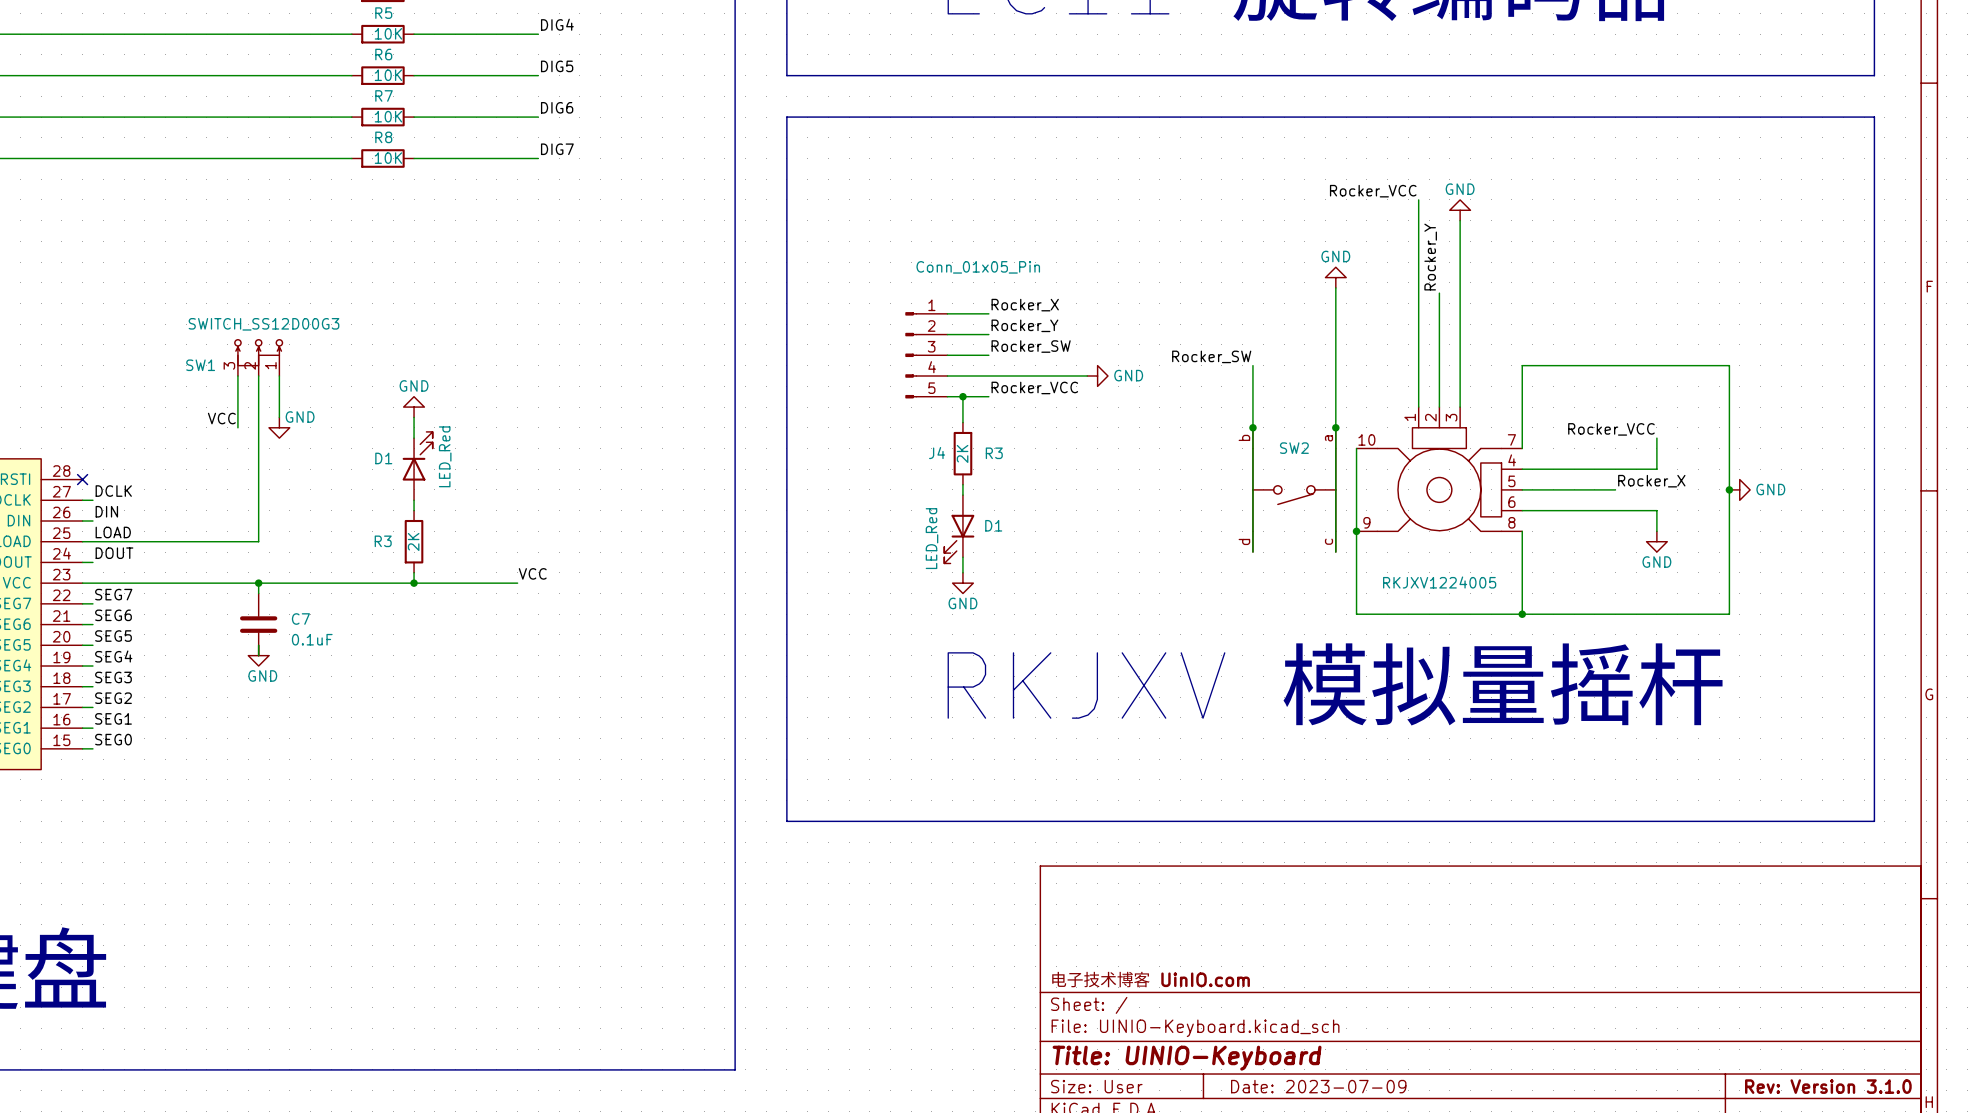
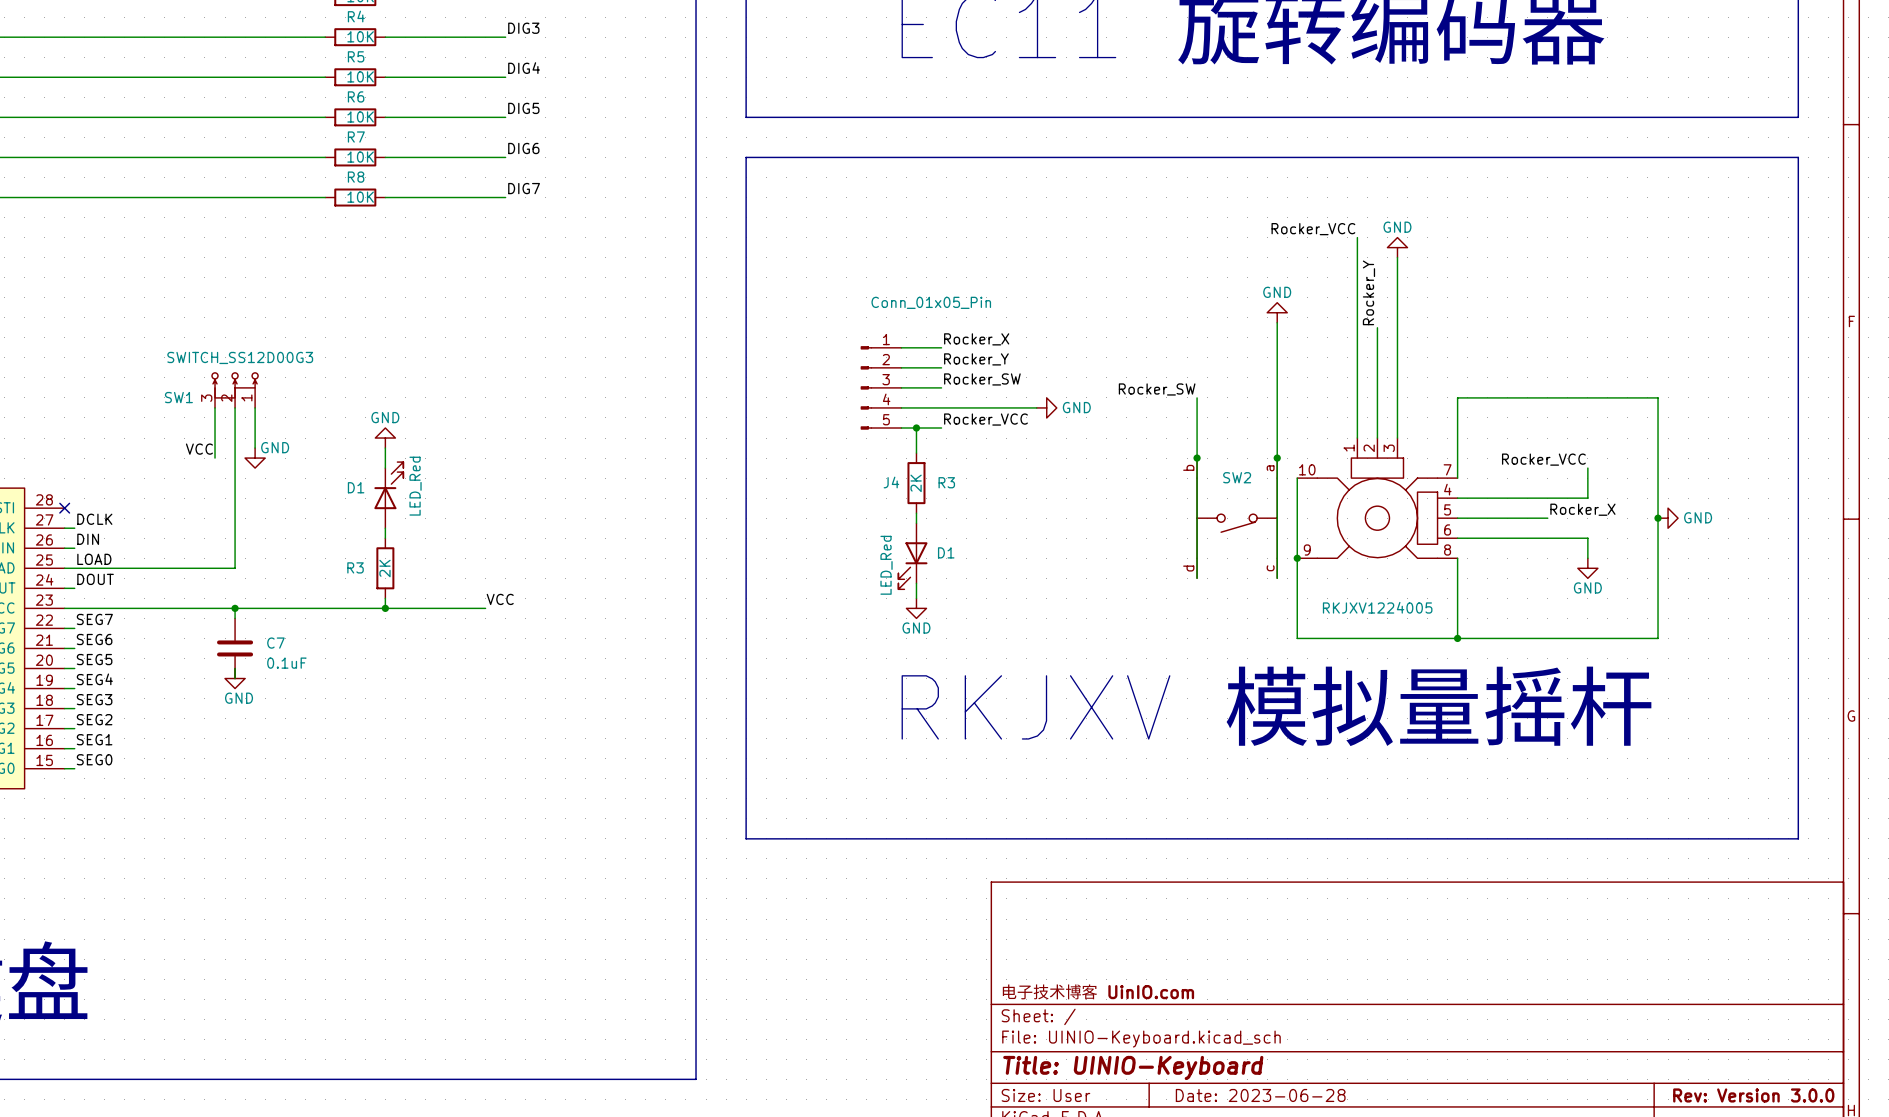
title block: Date: 2023-07-09 (1318, 1086) -> Date: 2023-06-28 (1260, 1095)
title block: Rev: Version 3.1.0 (1828, 1086) -> Rev: Version 3.0.0 (1753, 1095)

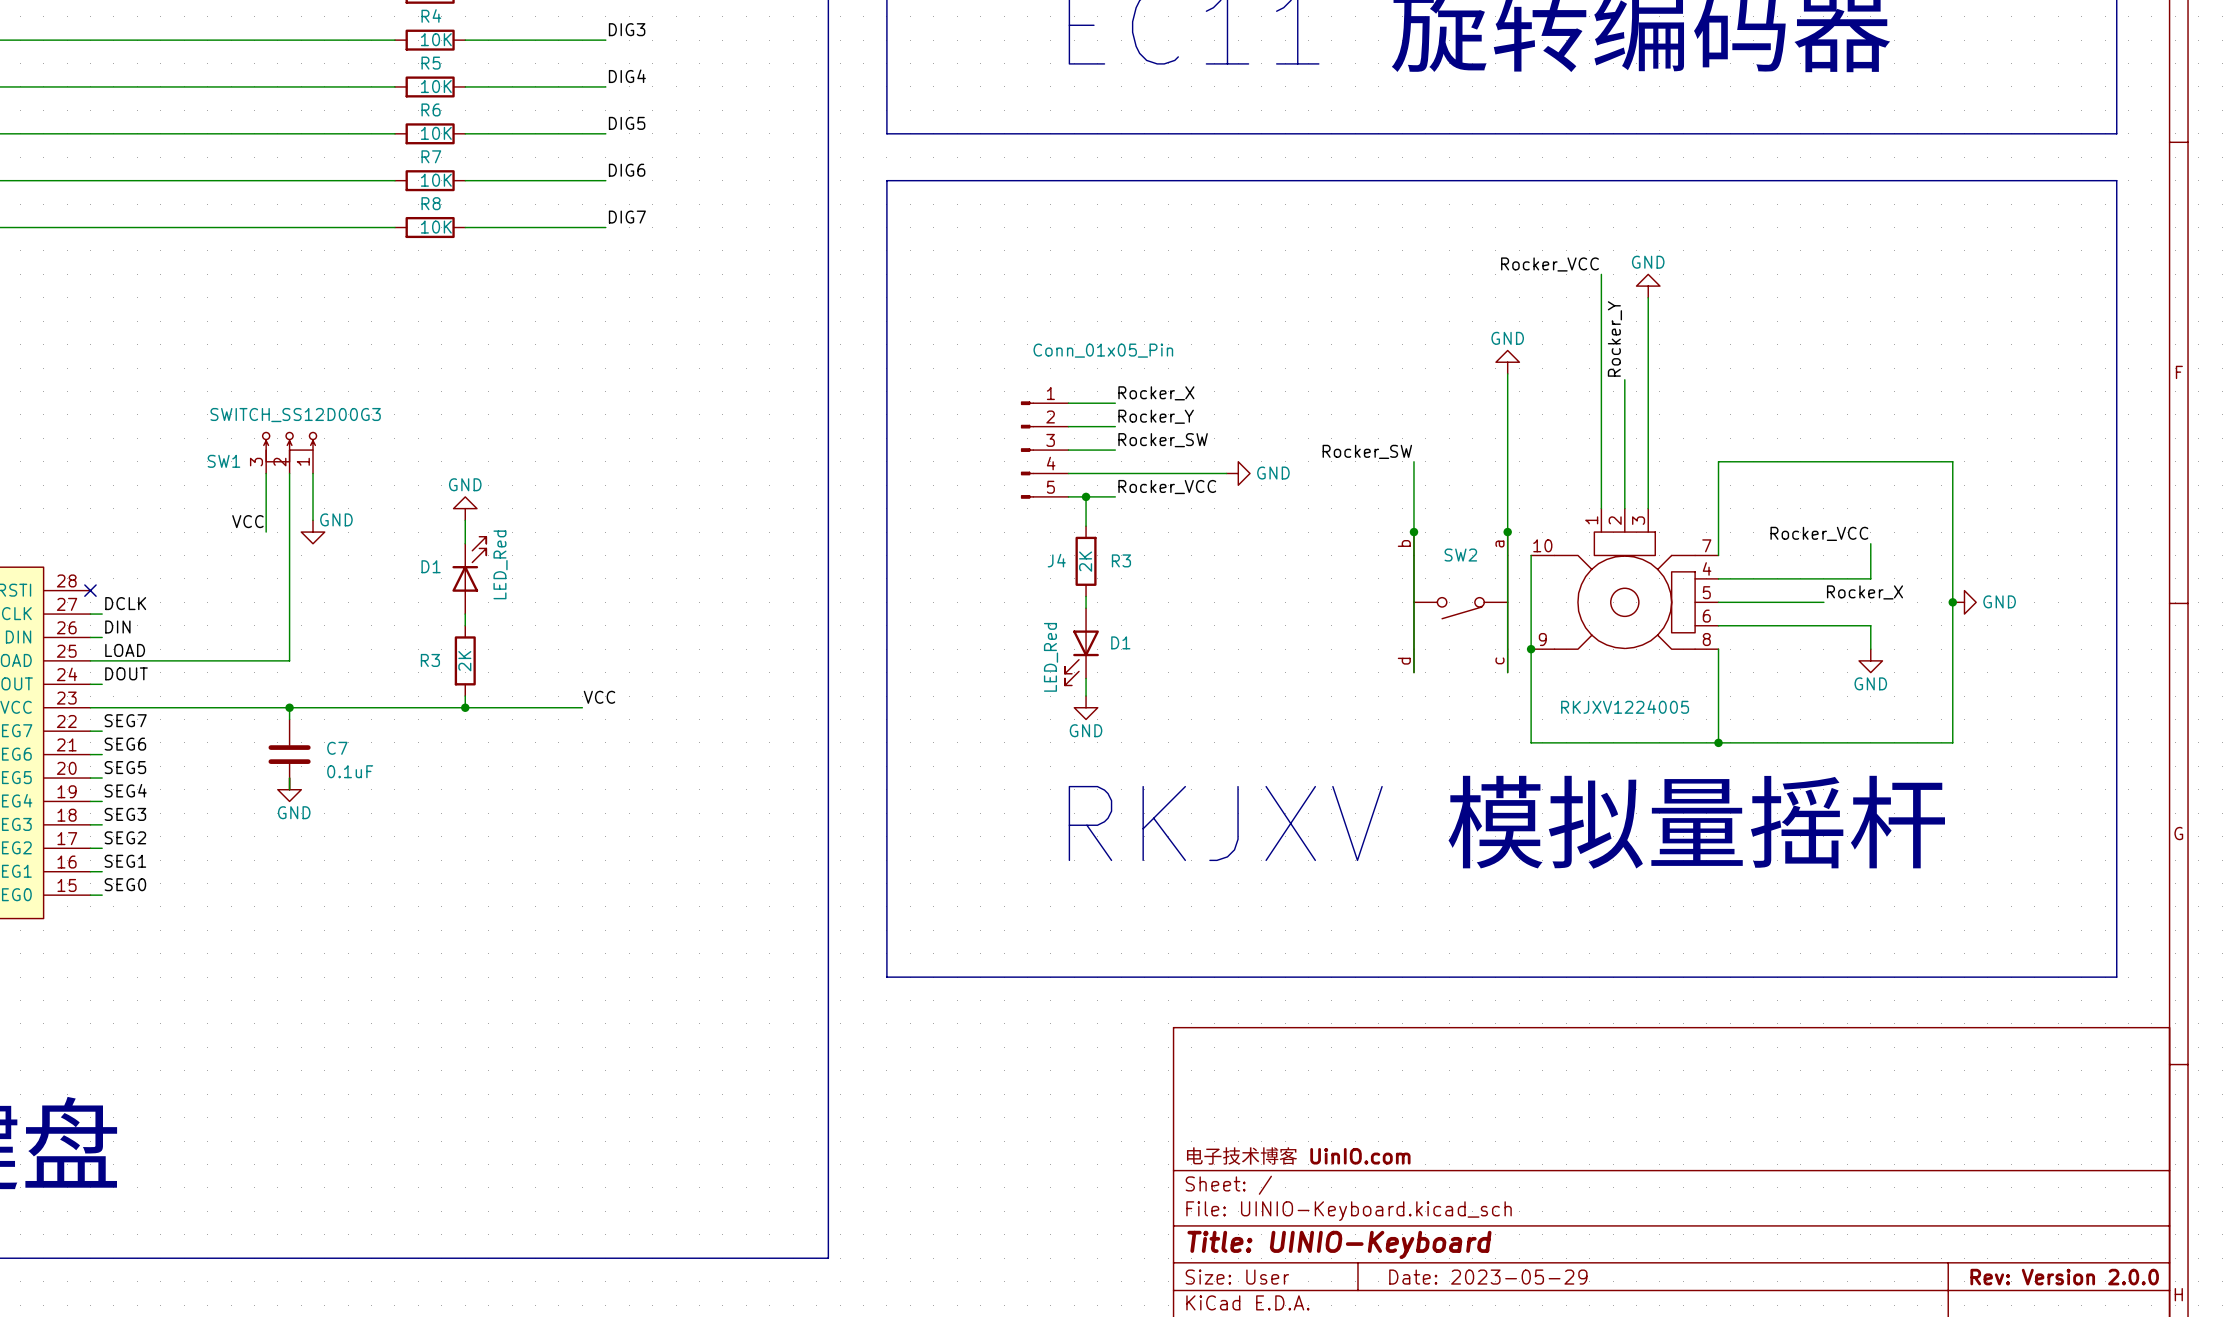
title block: Date: 2023-06-28 (1260, 1095) -> Date: 2023-05-29 (1488, 1277)
title block: Rev: Version 3.0.0 (1753, 1095) -> Rev: Version 2.0.0 (2064, 1277)

